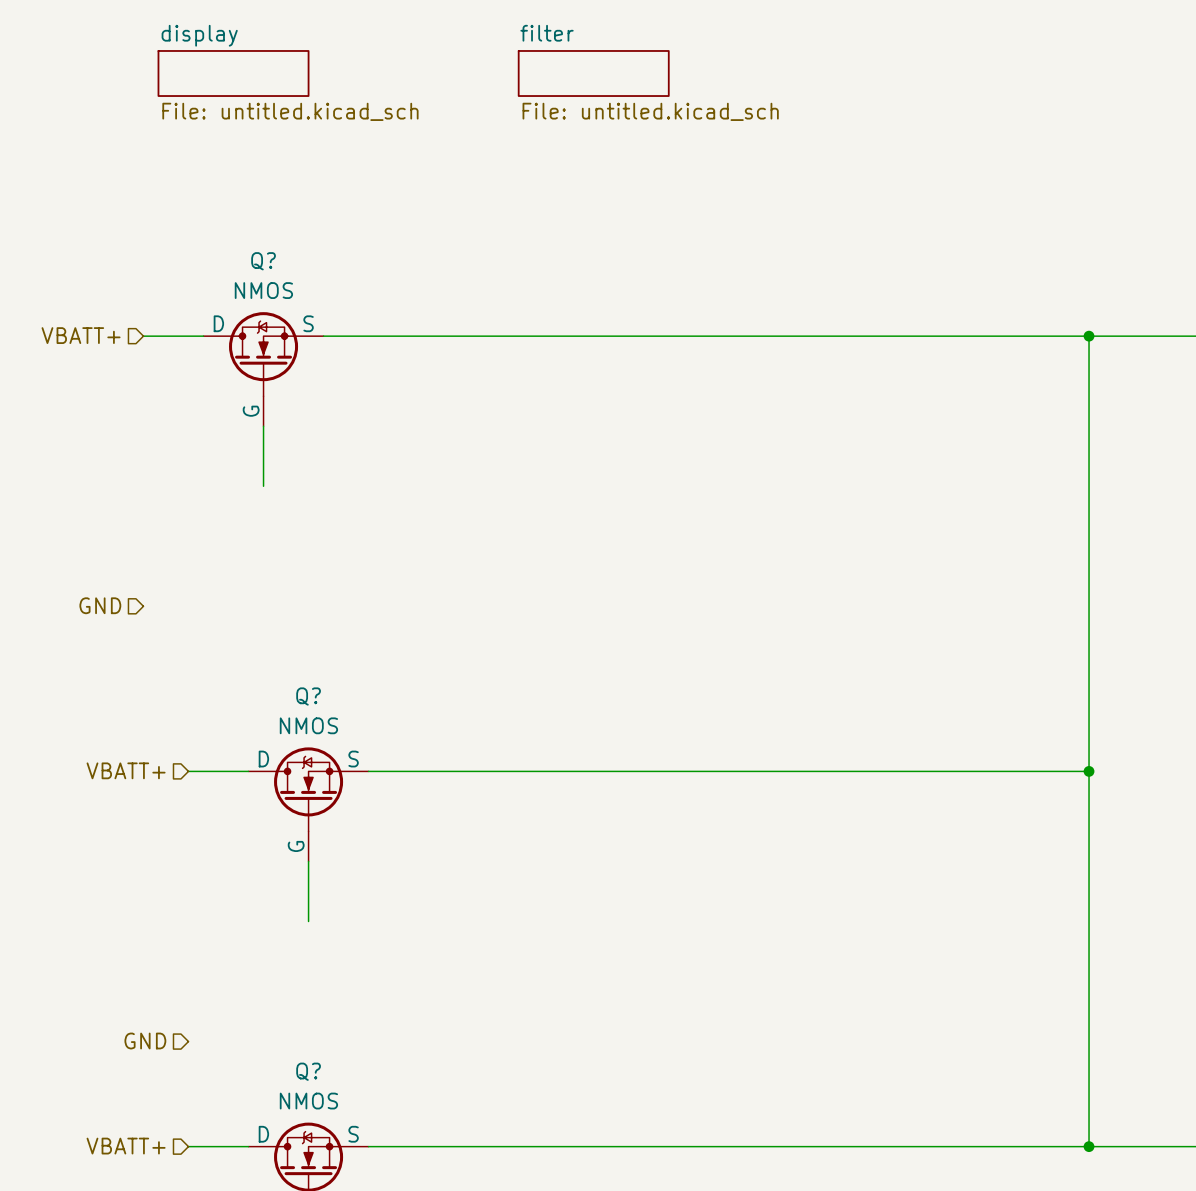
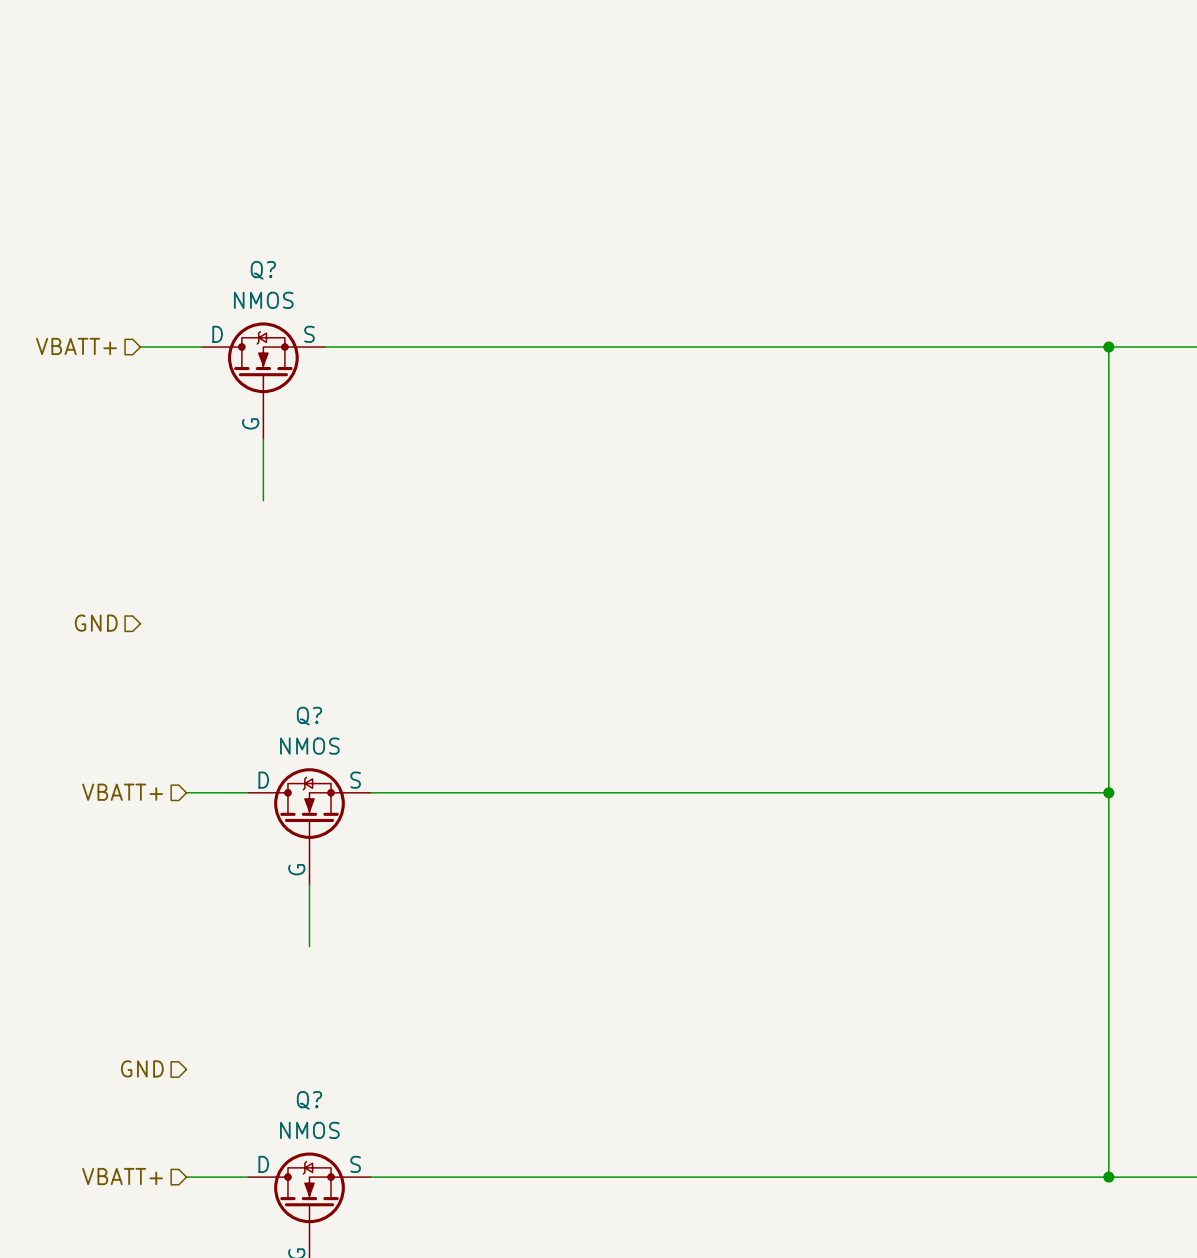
sheet display: File: untitled.kicad_sch (233, 73) -> none
sheet filter: File: untitled.kicad_sch (593, 73) -> none

